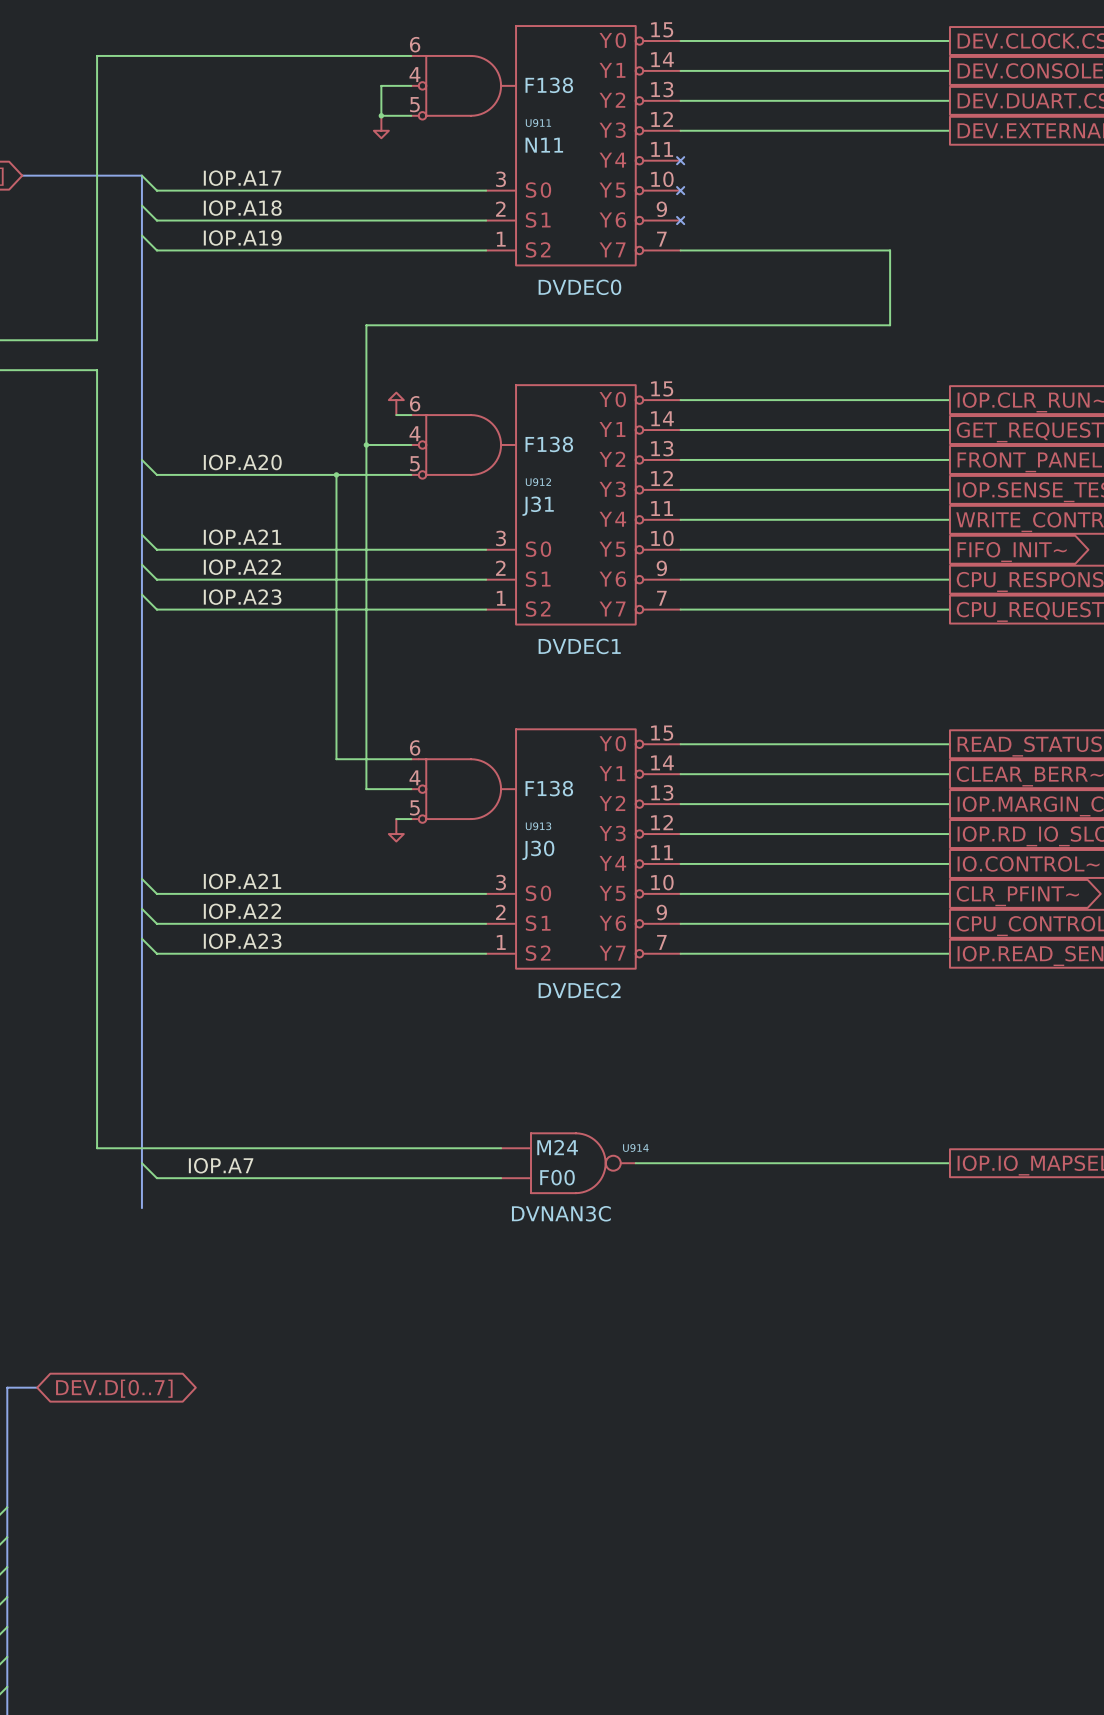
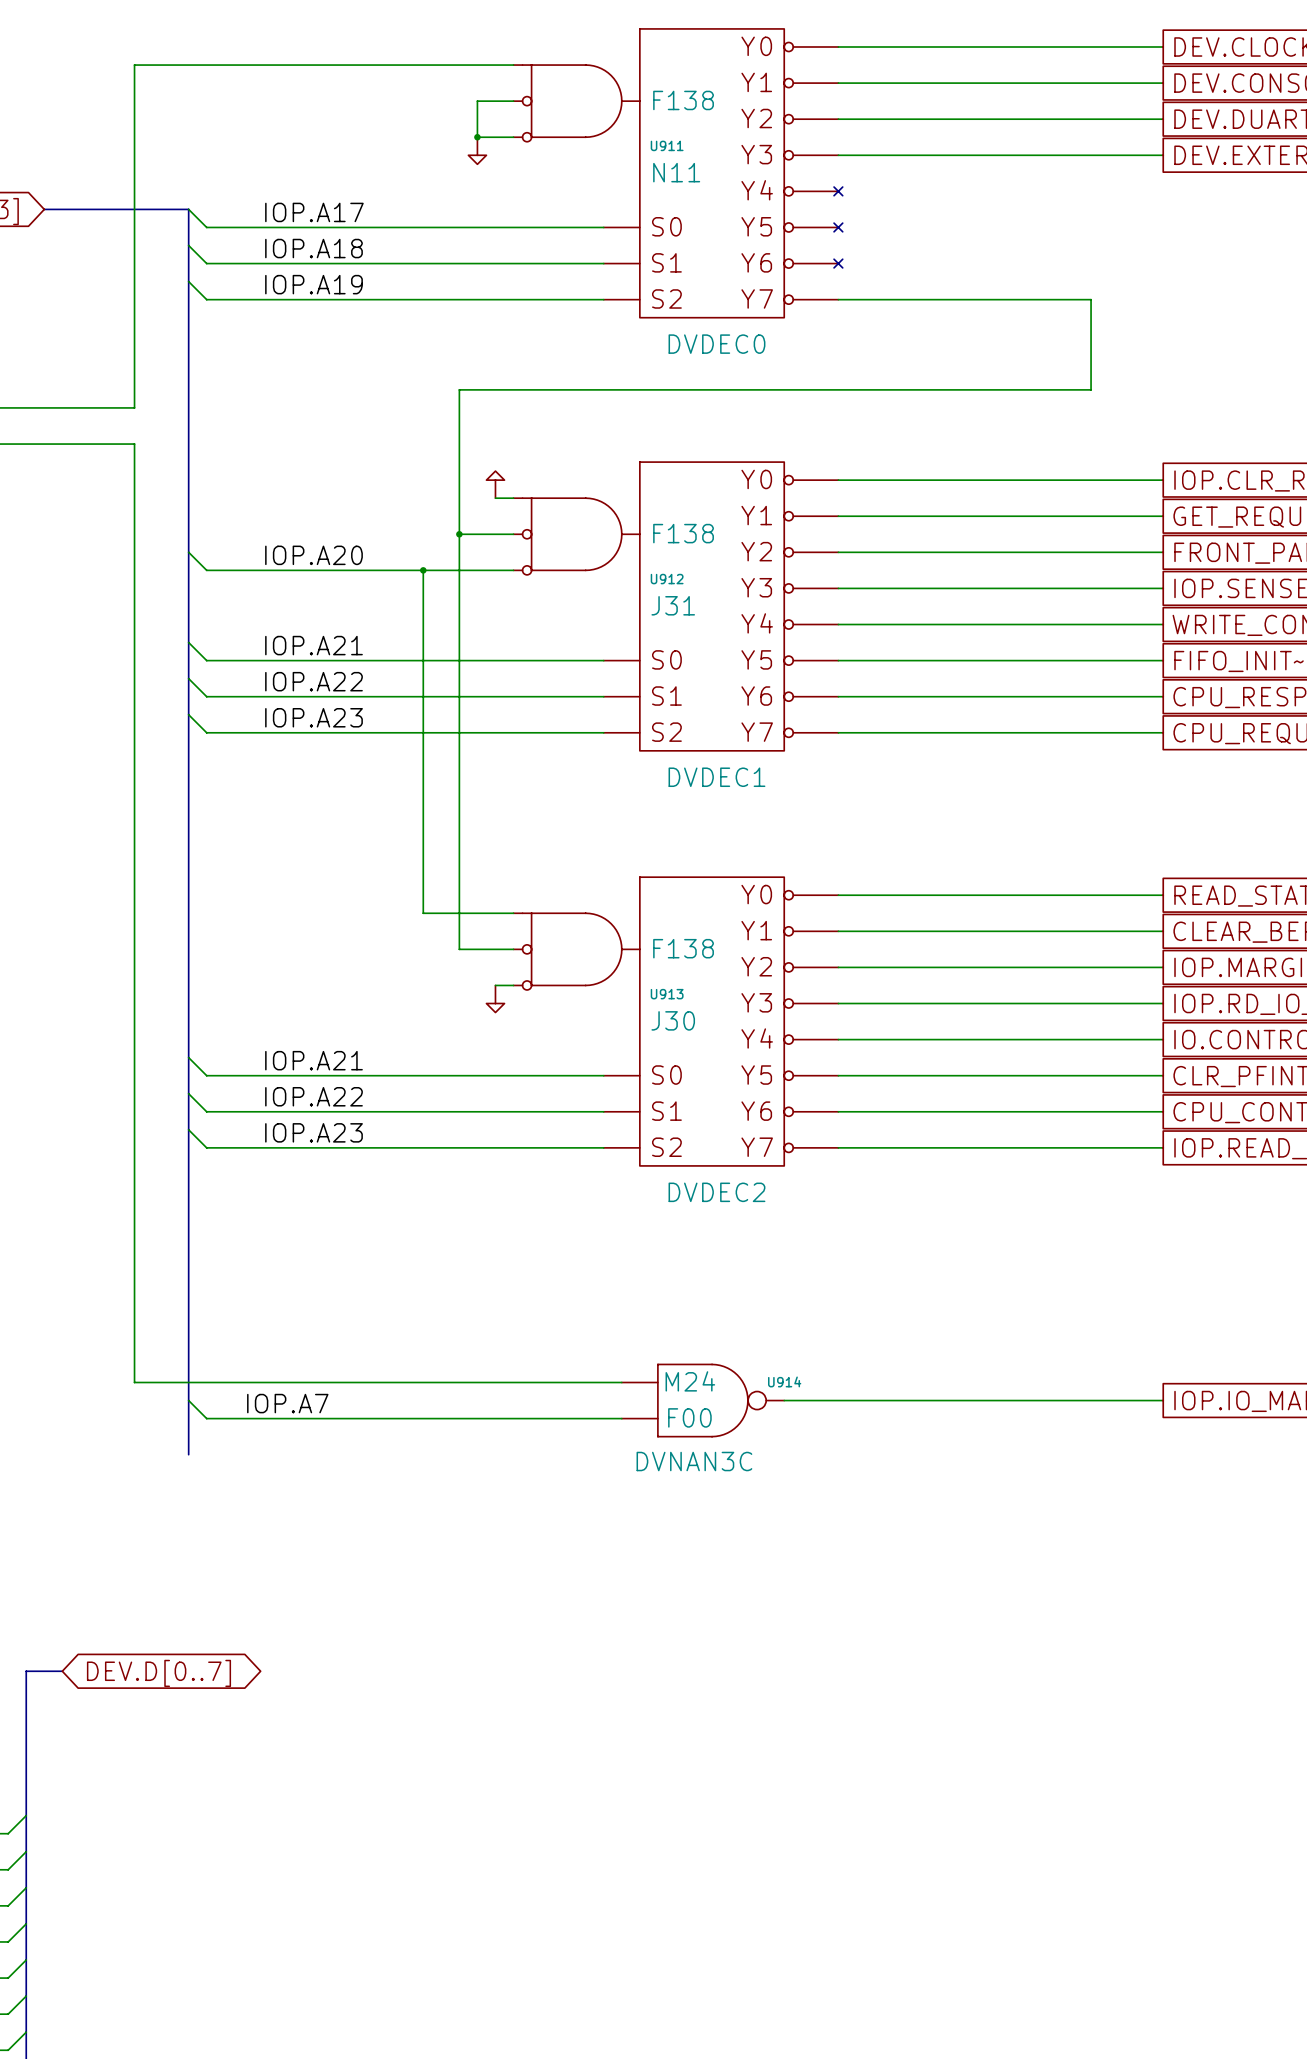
U911 symbol: [411, 25, 681, 266] -> [513, 28, 839, 319]
U912 symbol: [411, 384, 681, 626] -> [513, 461, 839, 752]
U913 symbol: [411, 728, 681, 970] -> [513, 876, 839, 1167]

